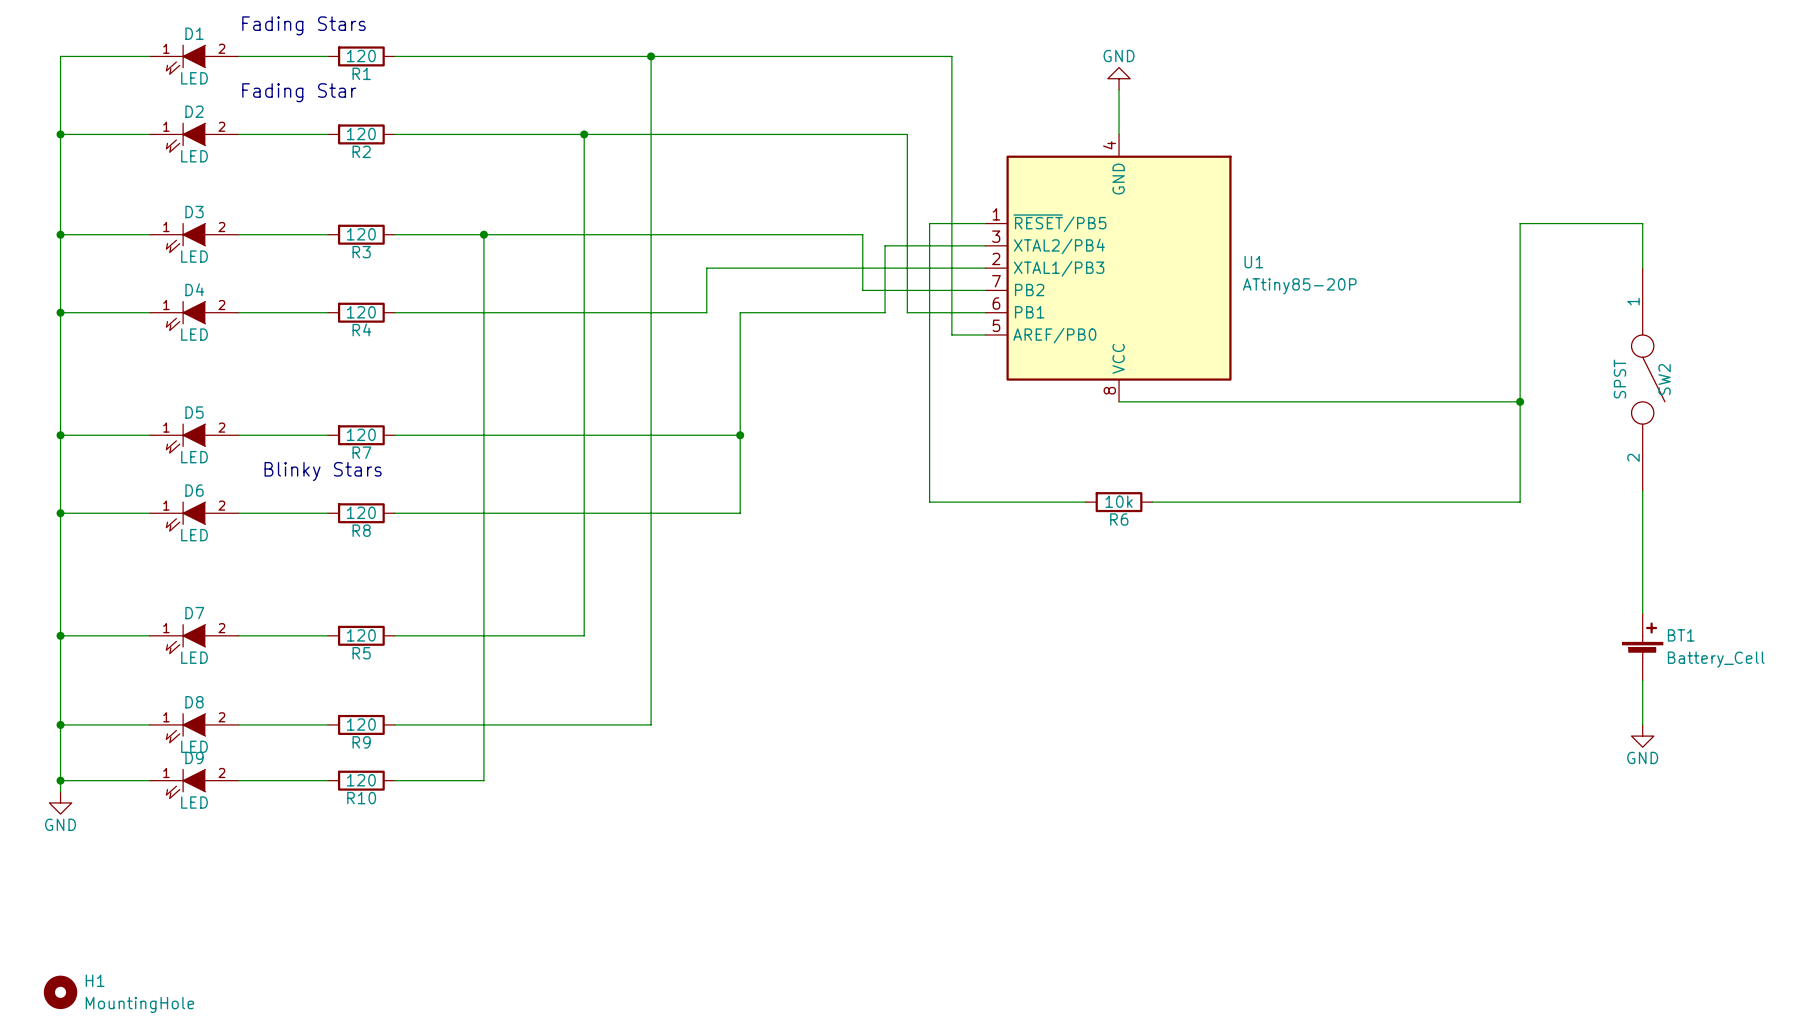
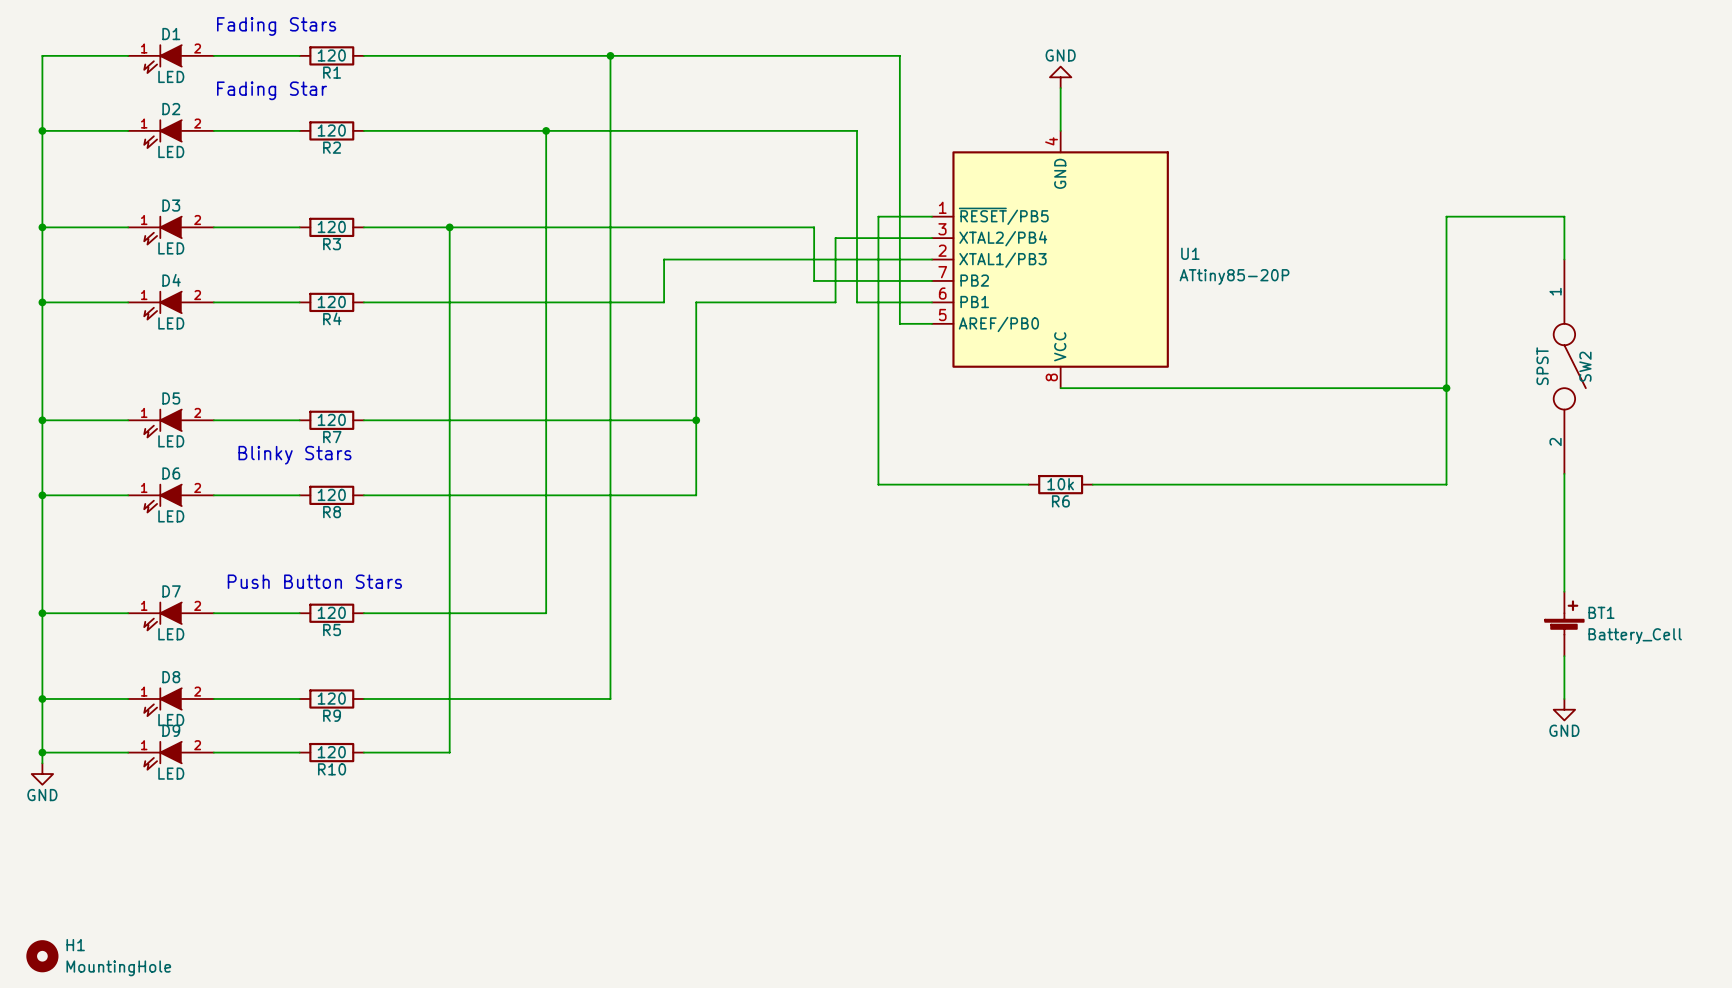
text: none -> Push Button Stars (314, 581)

